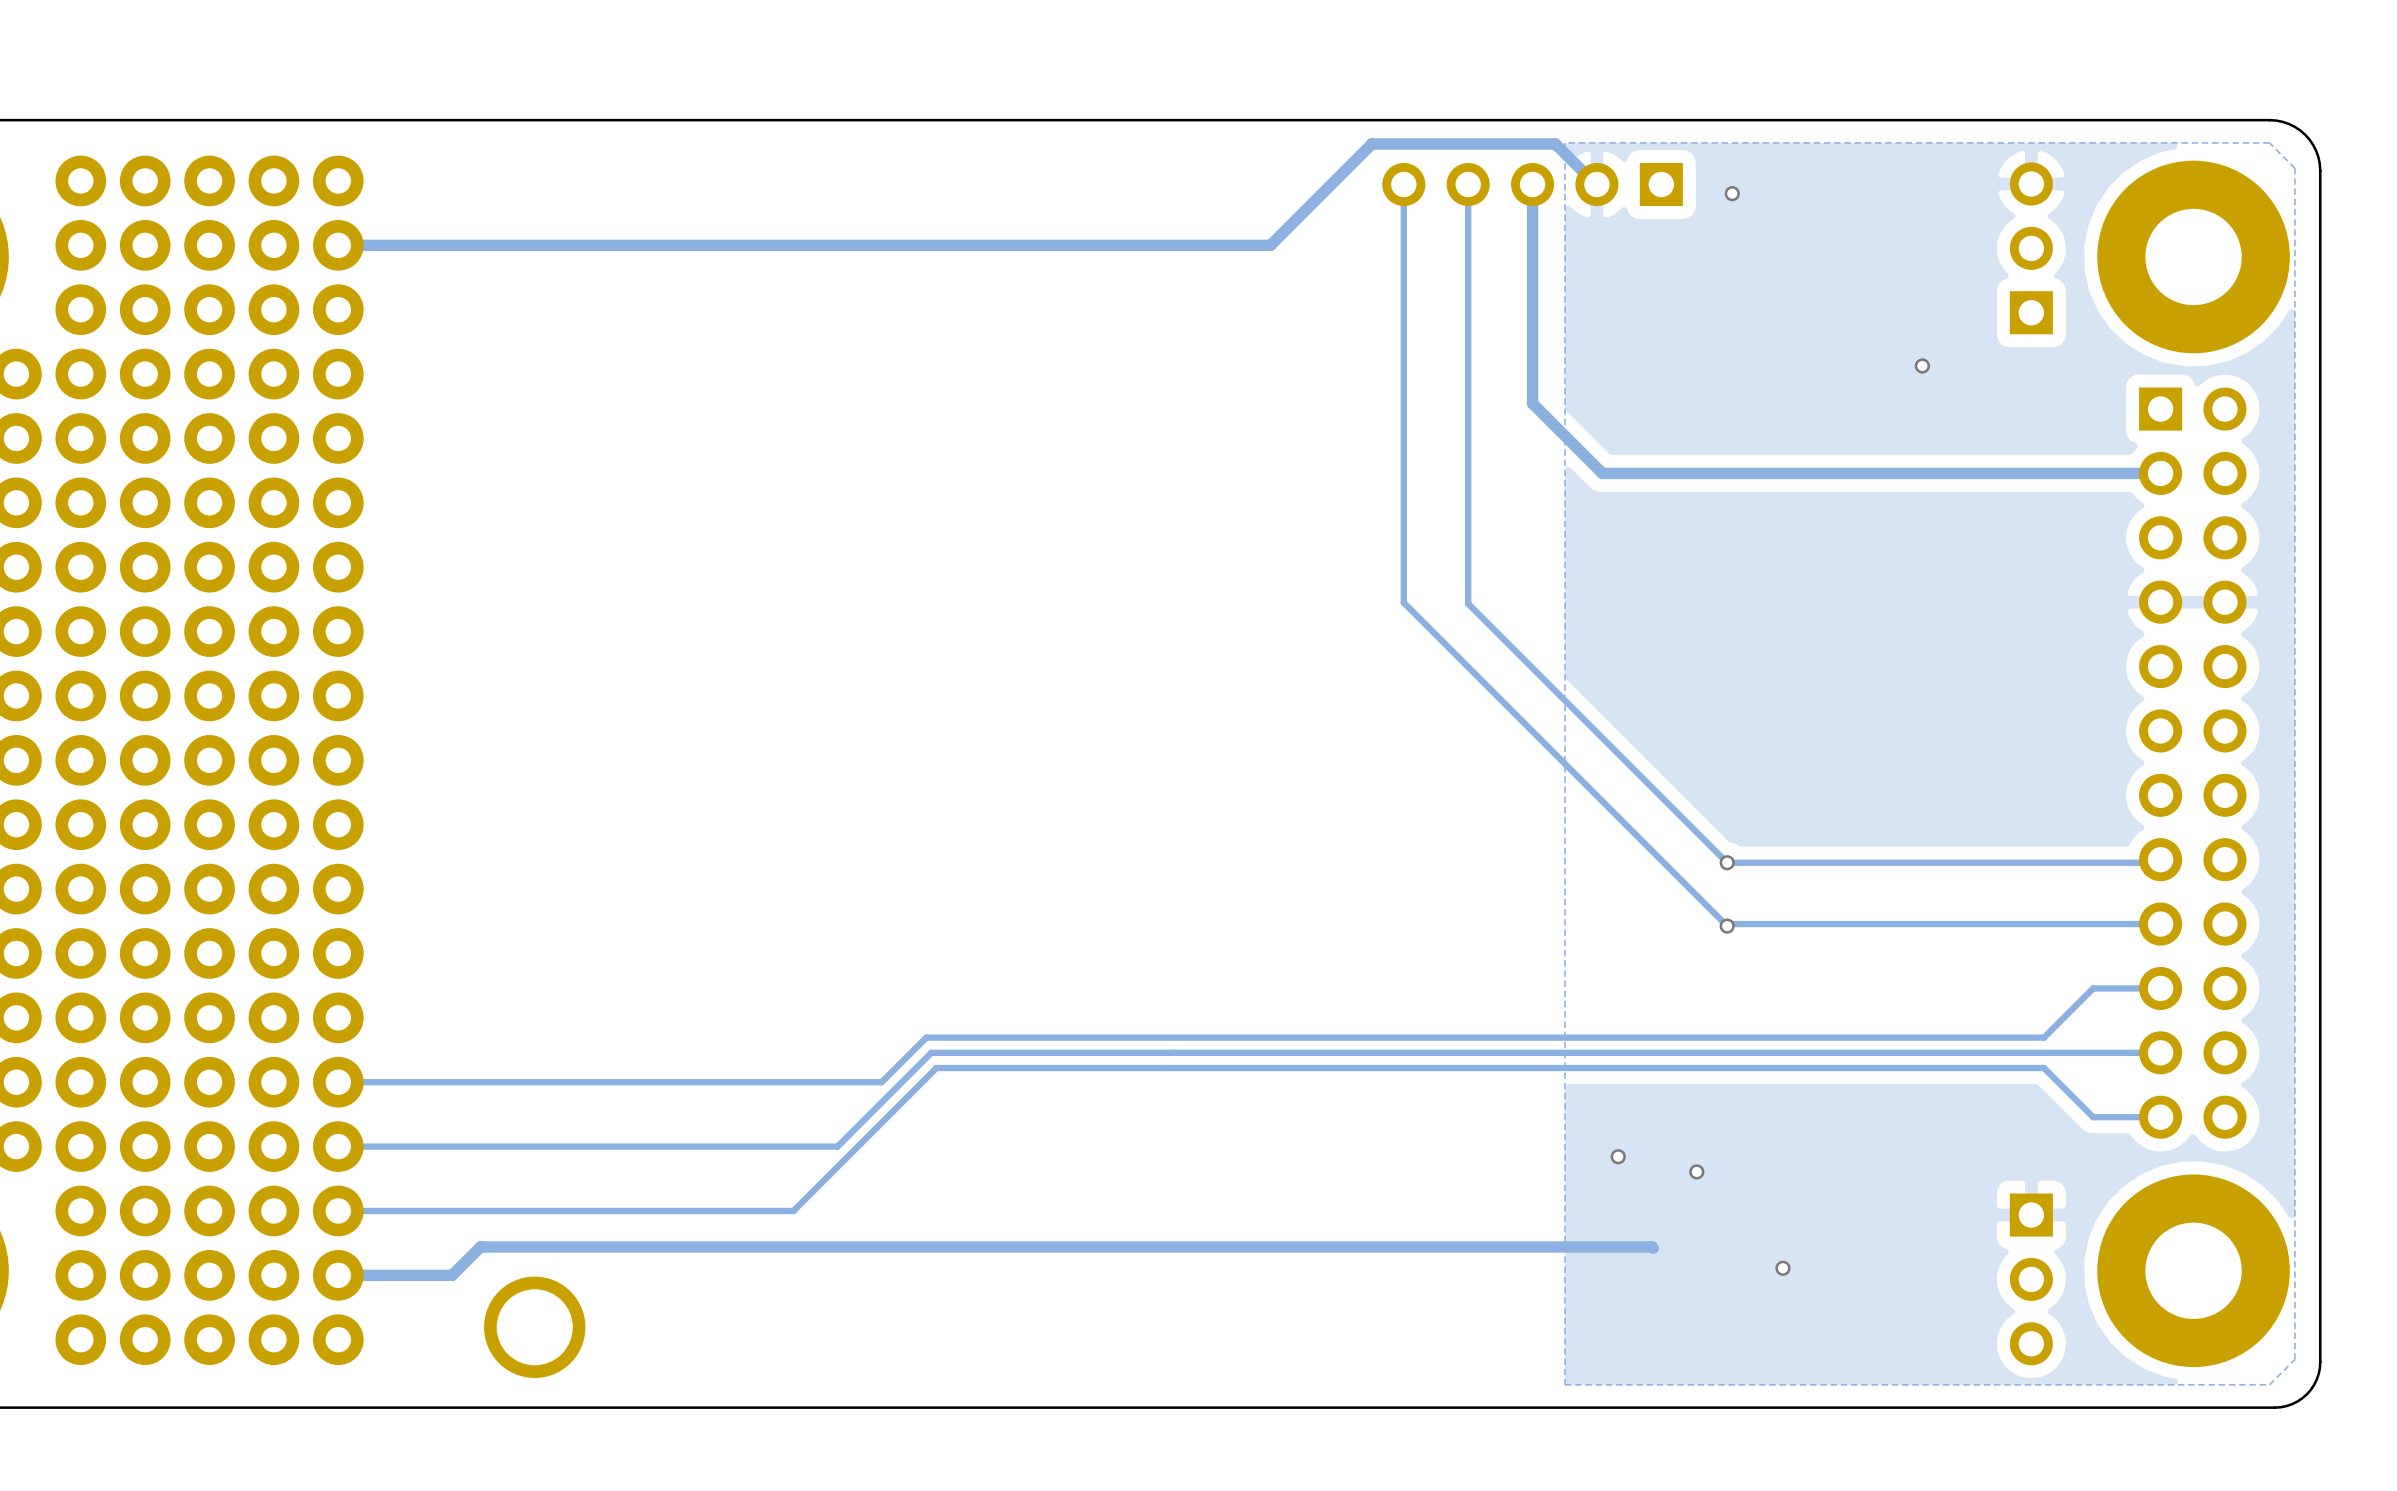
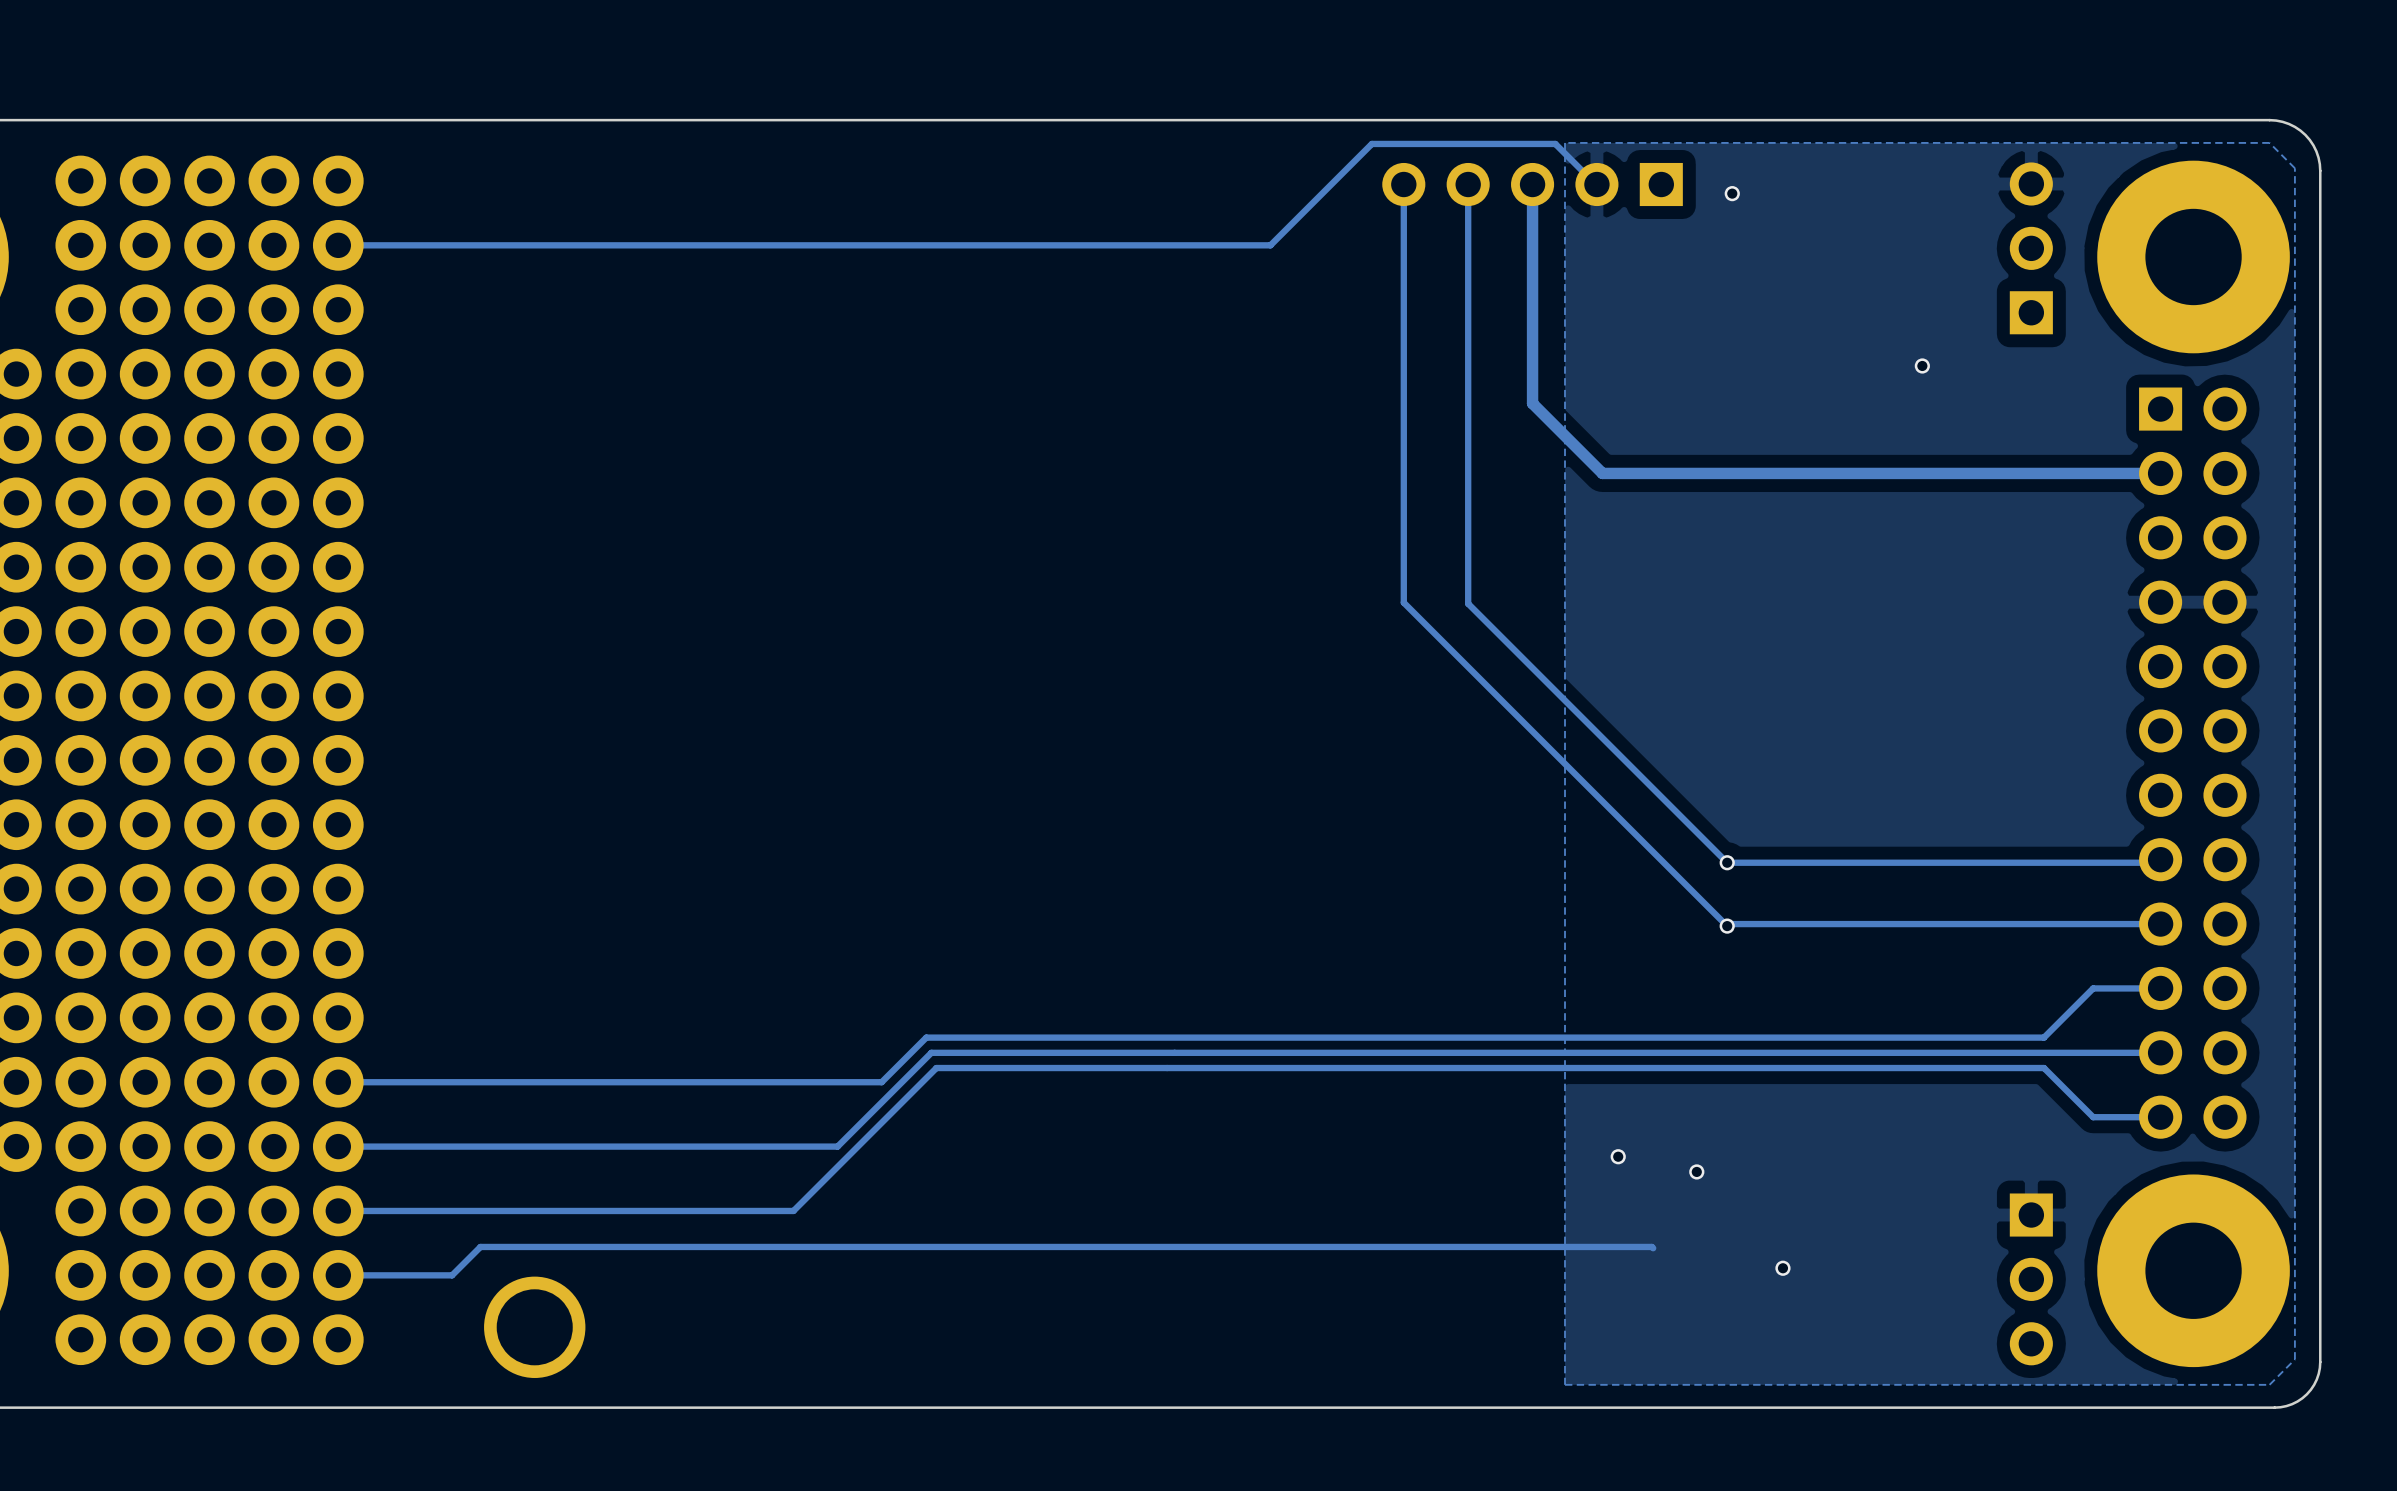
track width: thick (1596, 172) (1595, 184) (1555, 143) (1371, 143) (1270, 245) (338, 245) -> thin (1596, 172) (1595, 184) (1555, 143) (1371, 143) (1270, 245) (338, 245)
track width: thick (1653, 1248) (480, 1246) (452, 1275) (338, 1275) -> thin (1653, 1248) (480, 1246) (452, 1275) (338, 1275)

